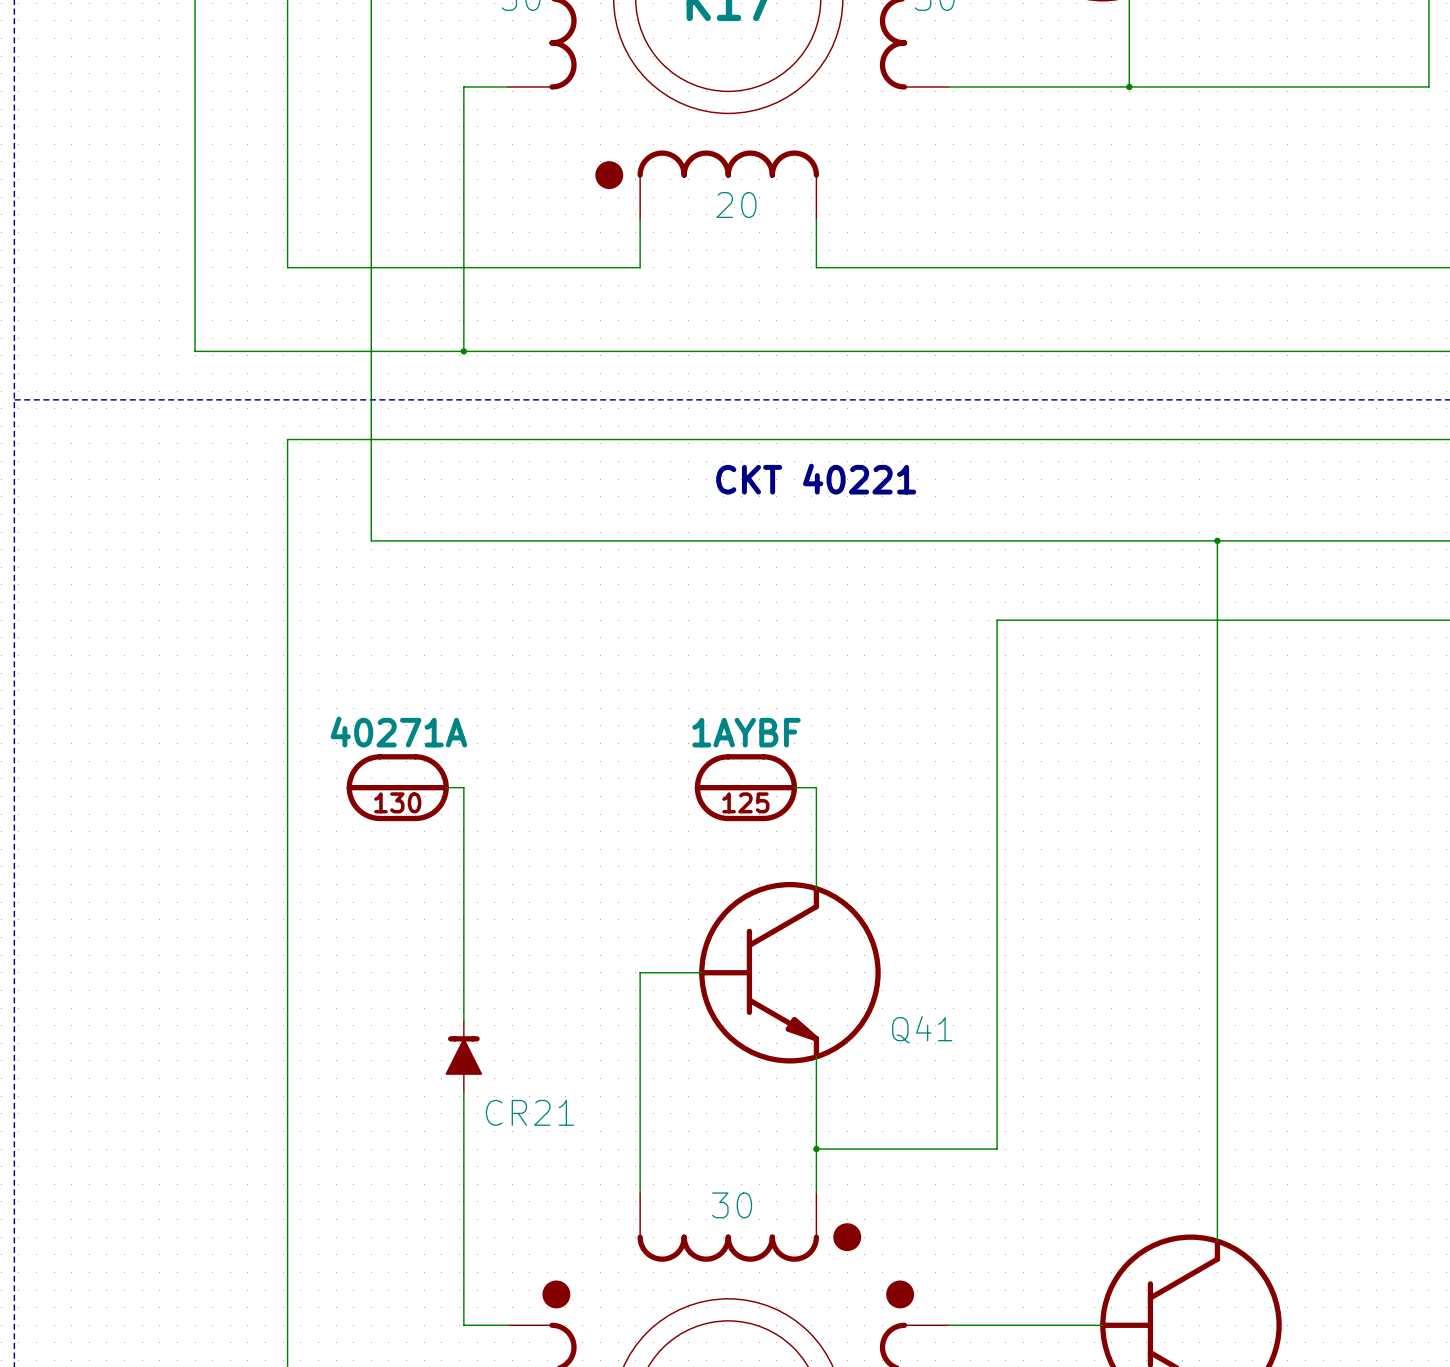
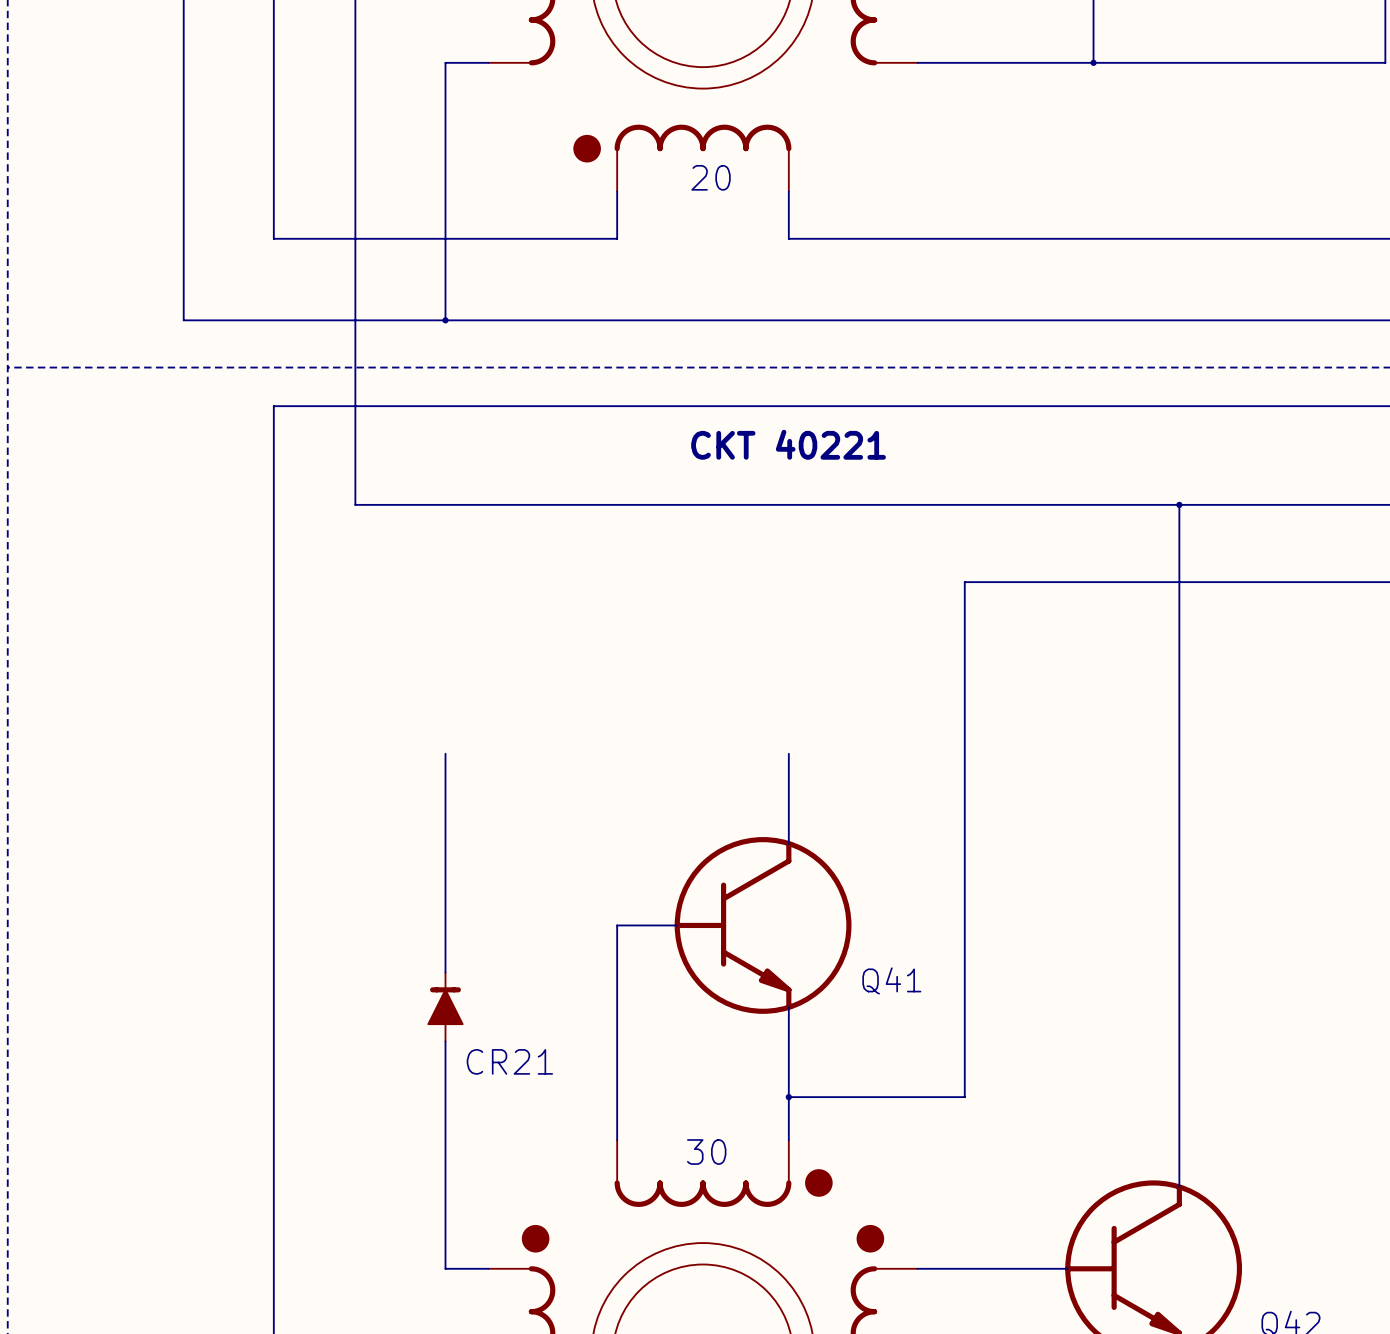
part: (397, 787) -> none
wire: (446, 787) (463, 787) (463, 796) -> none
part: (745, 787) -> none
wire: (794, 787) (816, 787) (816, 796) -> none

